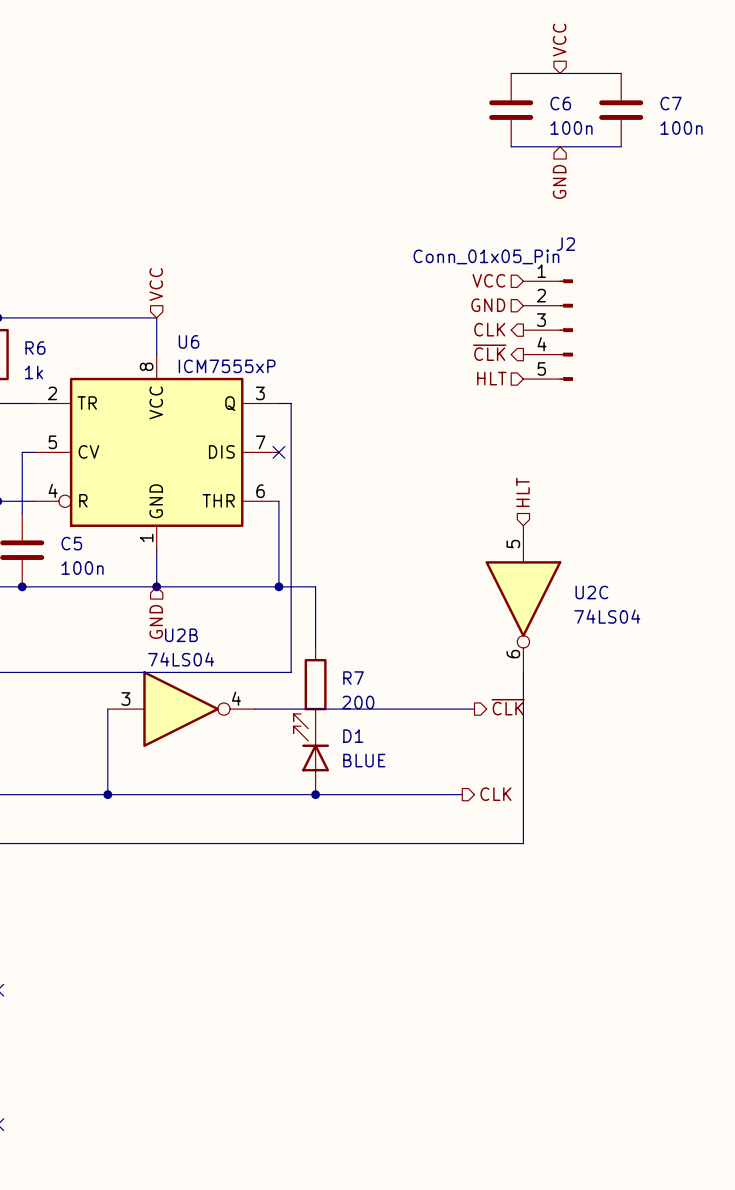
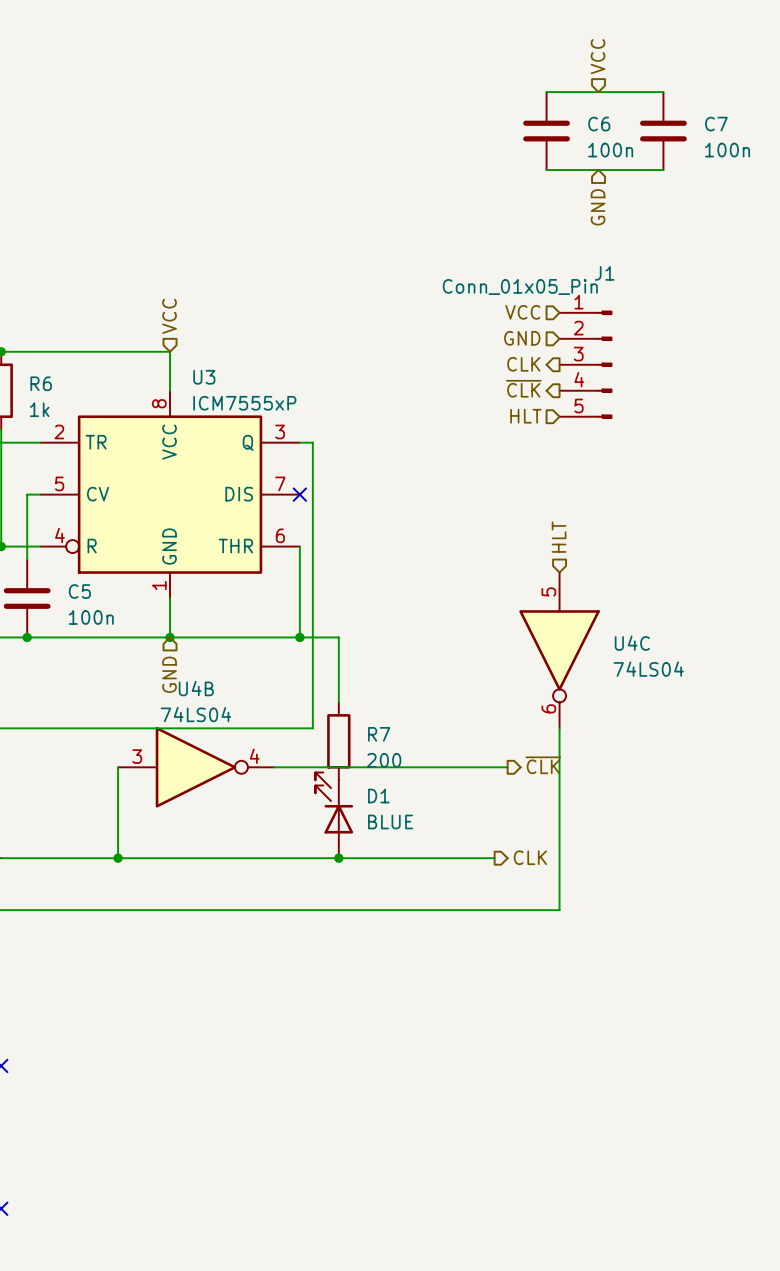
J2 name: J2 (565, 244) -> J1 (604, 273)
U6 name: U6 (189, 341) -> U3 (204, 377)
U2C name: U2C (591, 592) -> U4C (632, 643)
U2B name: U2B (181, 635) -> U4B (196, 688)

